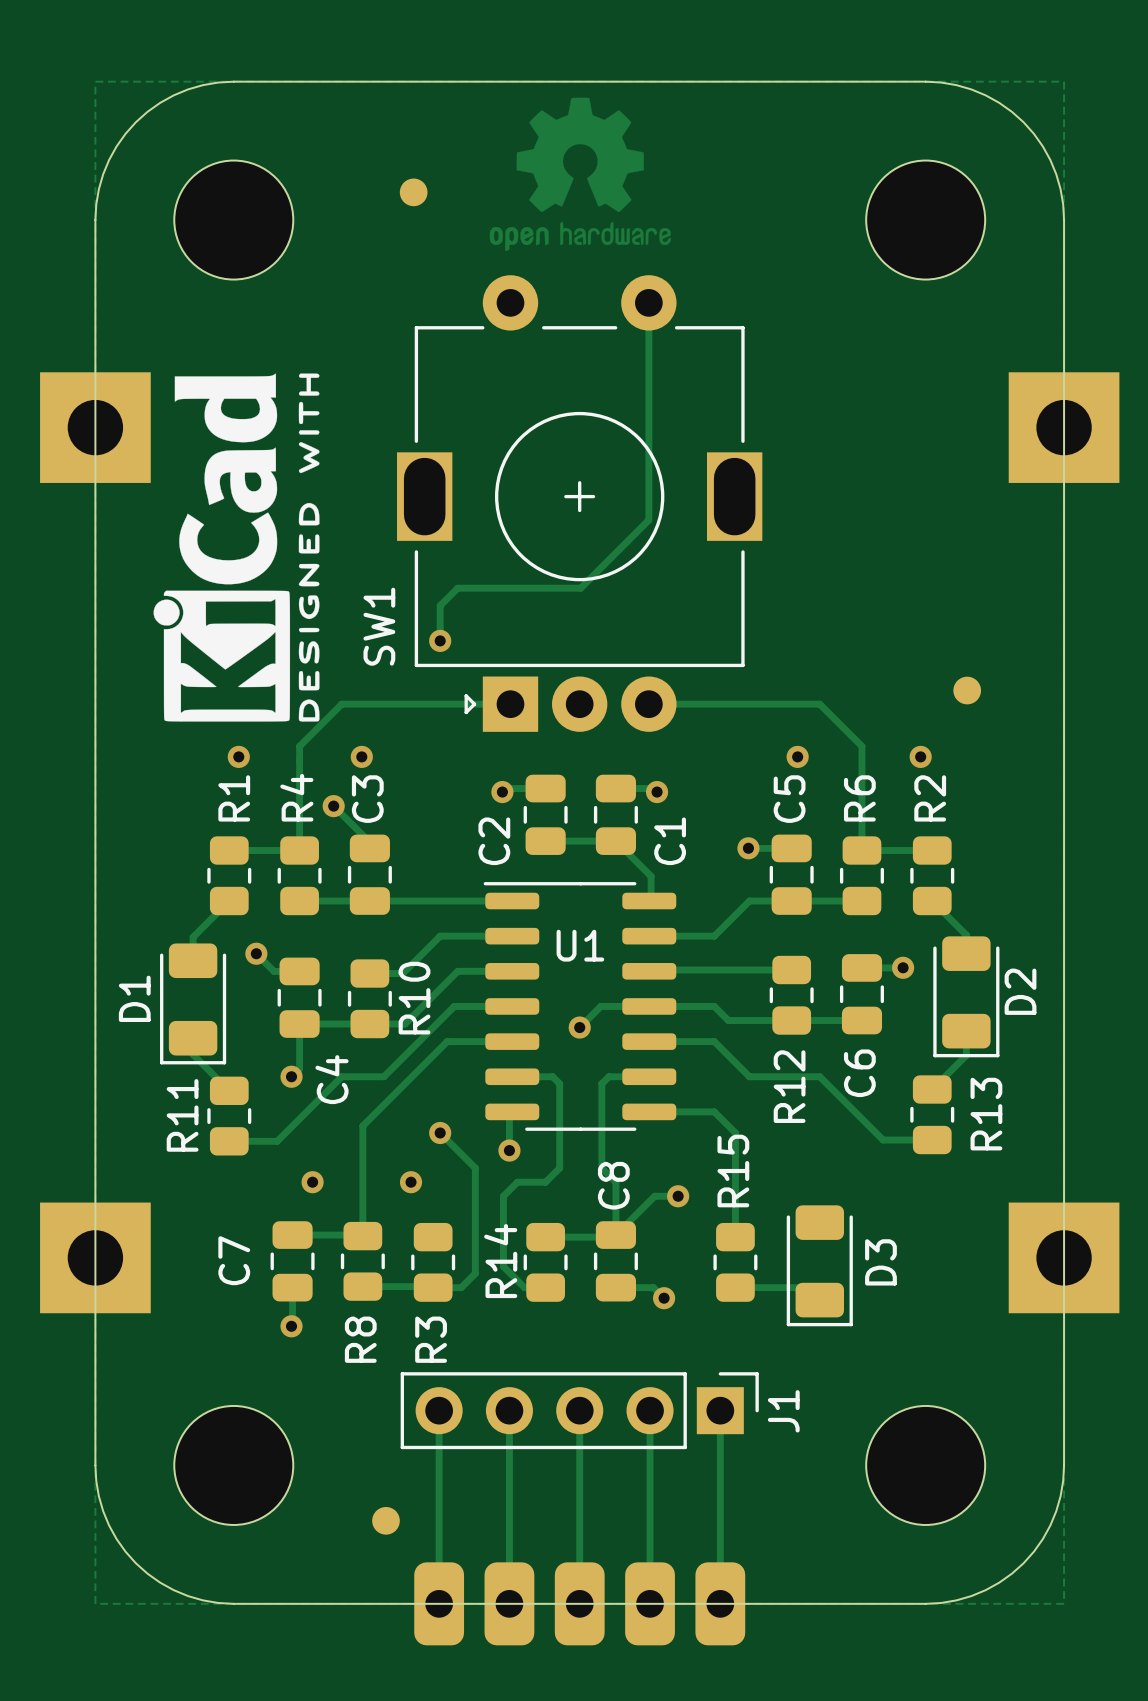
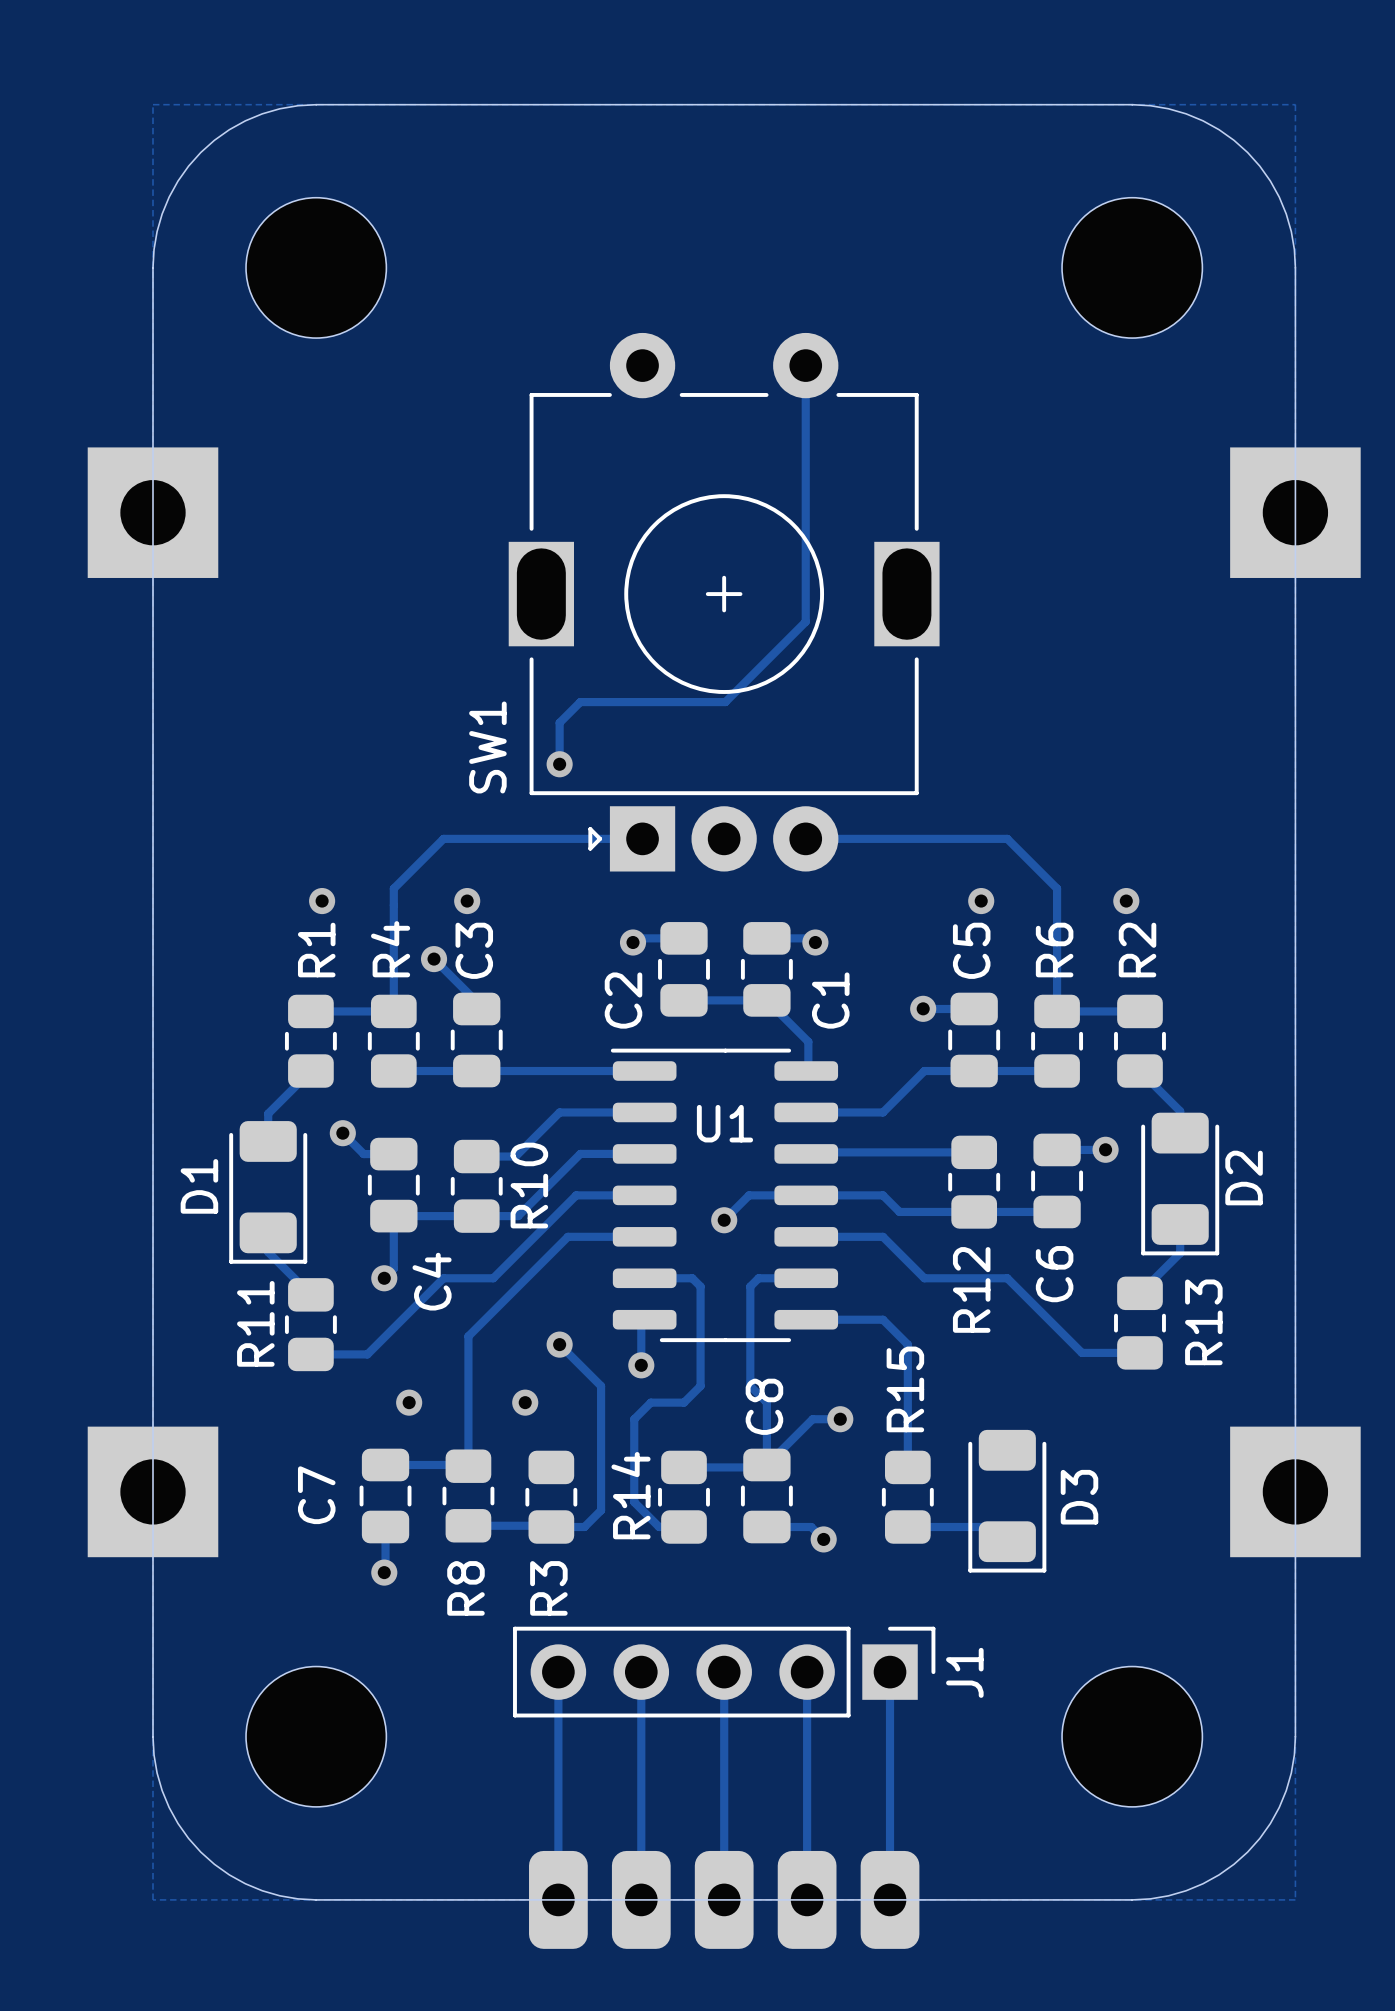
drawing: [489, 97, 671, 252] -> none
part: (413, 192) -> none
drawing: [153, 373, 320, 722] -> none
part: (967, 690) -> none
part: (386, 1520) -> none

